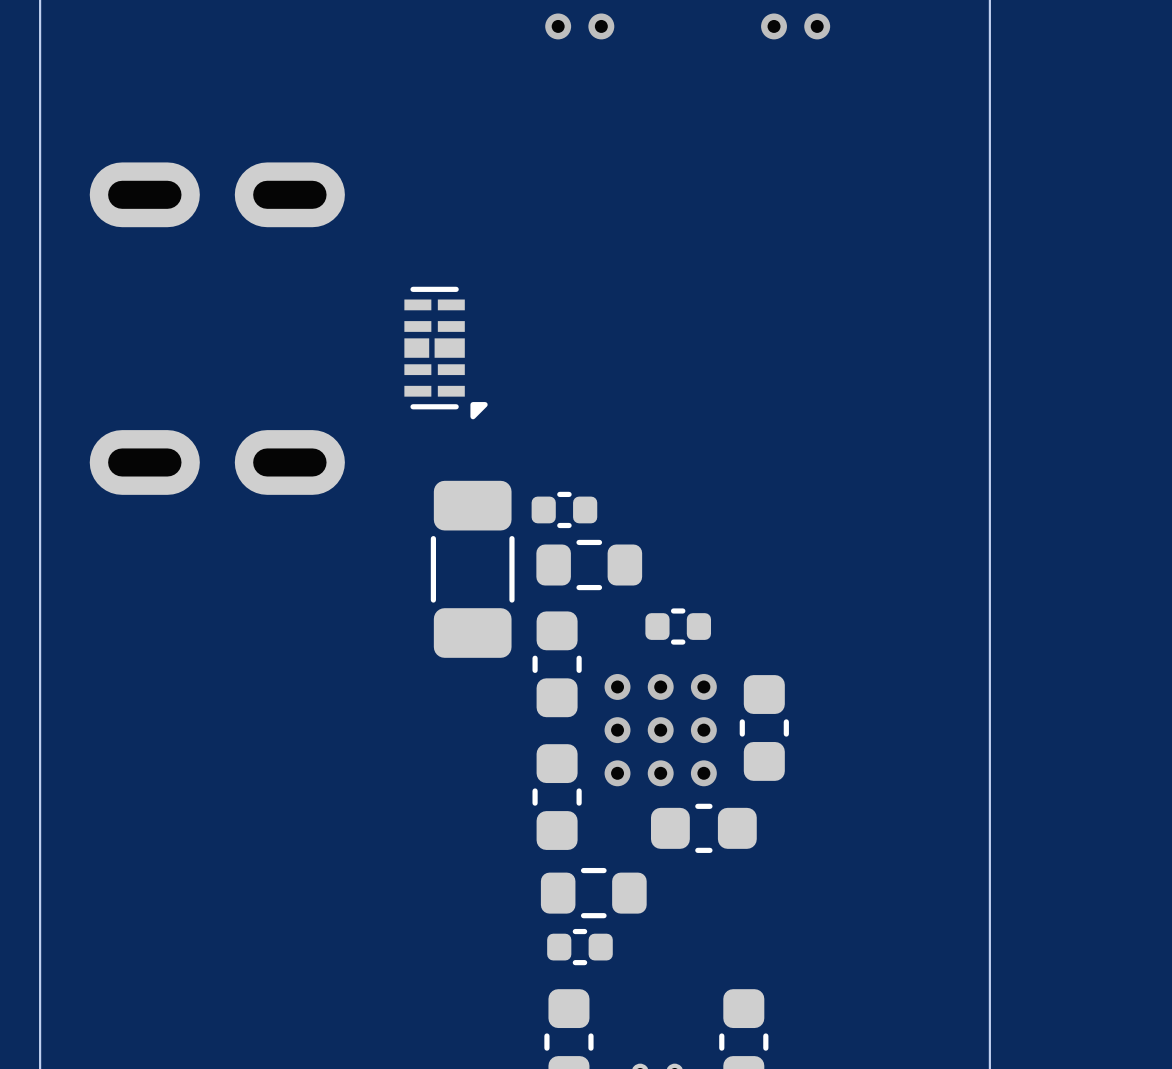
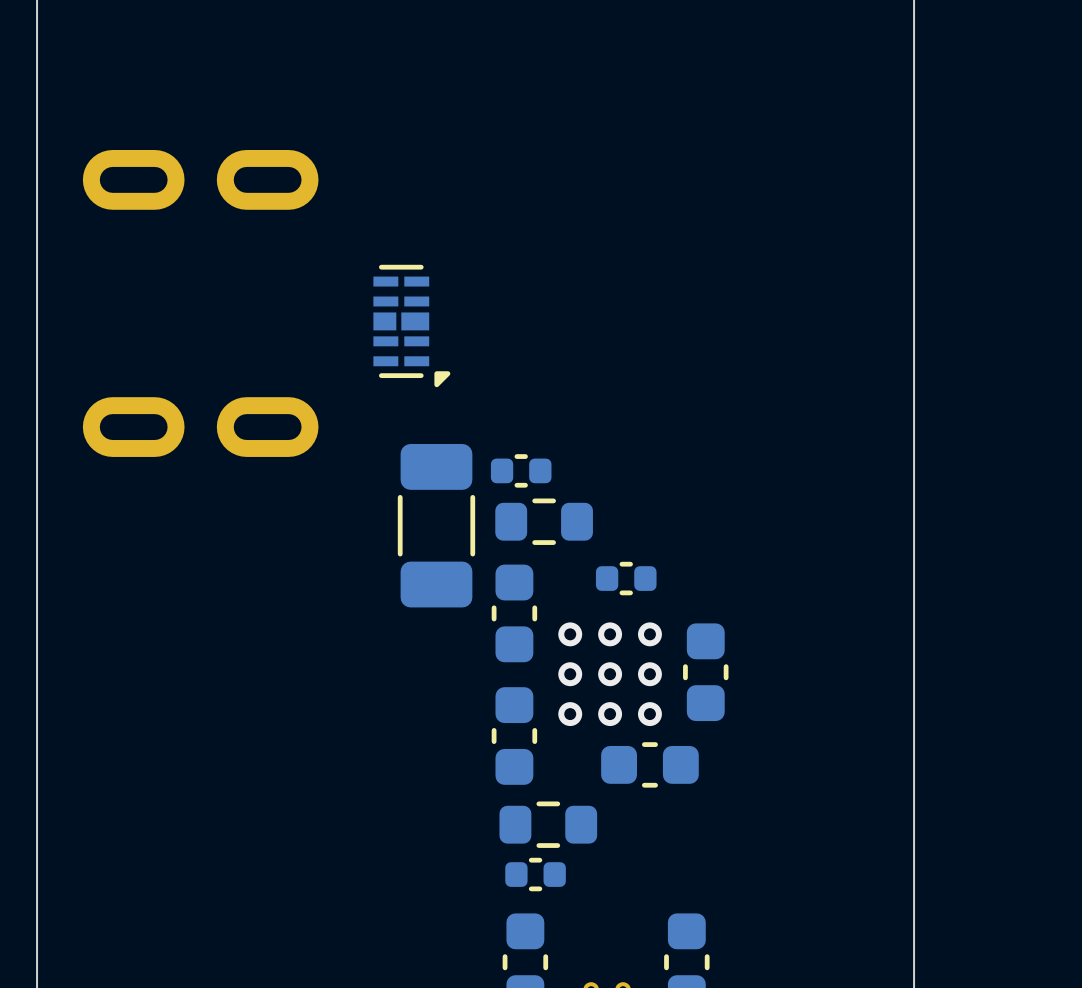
via: (558, 26) -> none
via: (601, 26) -> none
via: (774, 26) -> none
via: (817, 26) -> none

